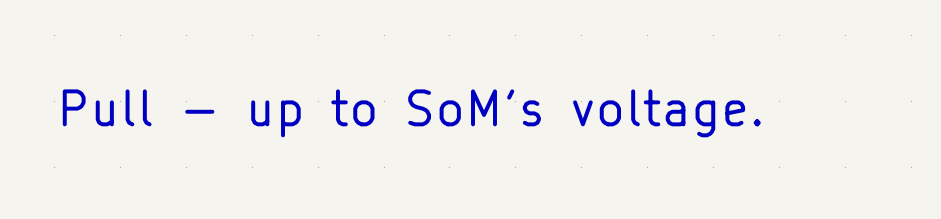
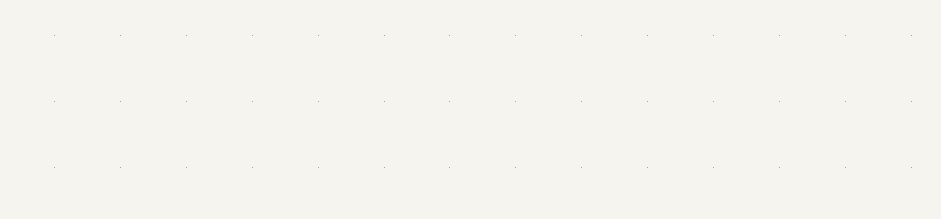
text: Pull - up to SoM's voltage. (411, 113) -> none

